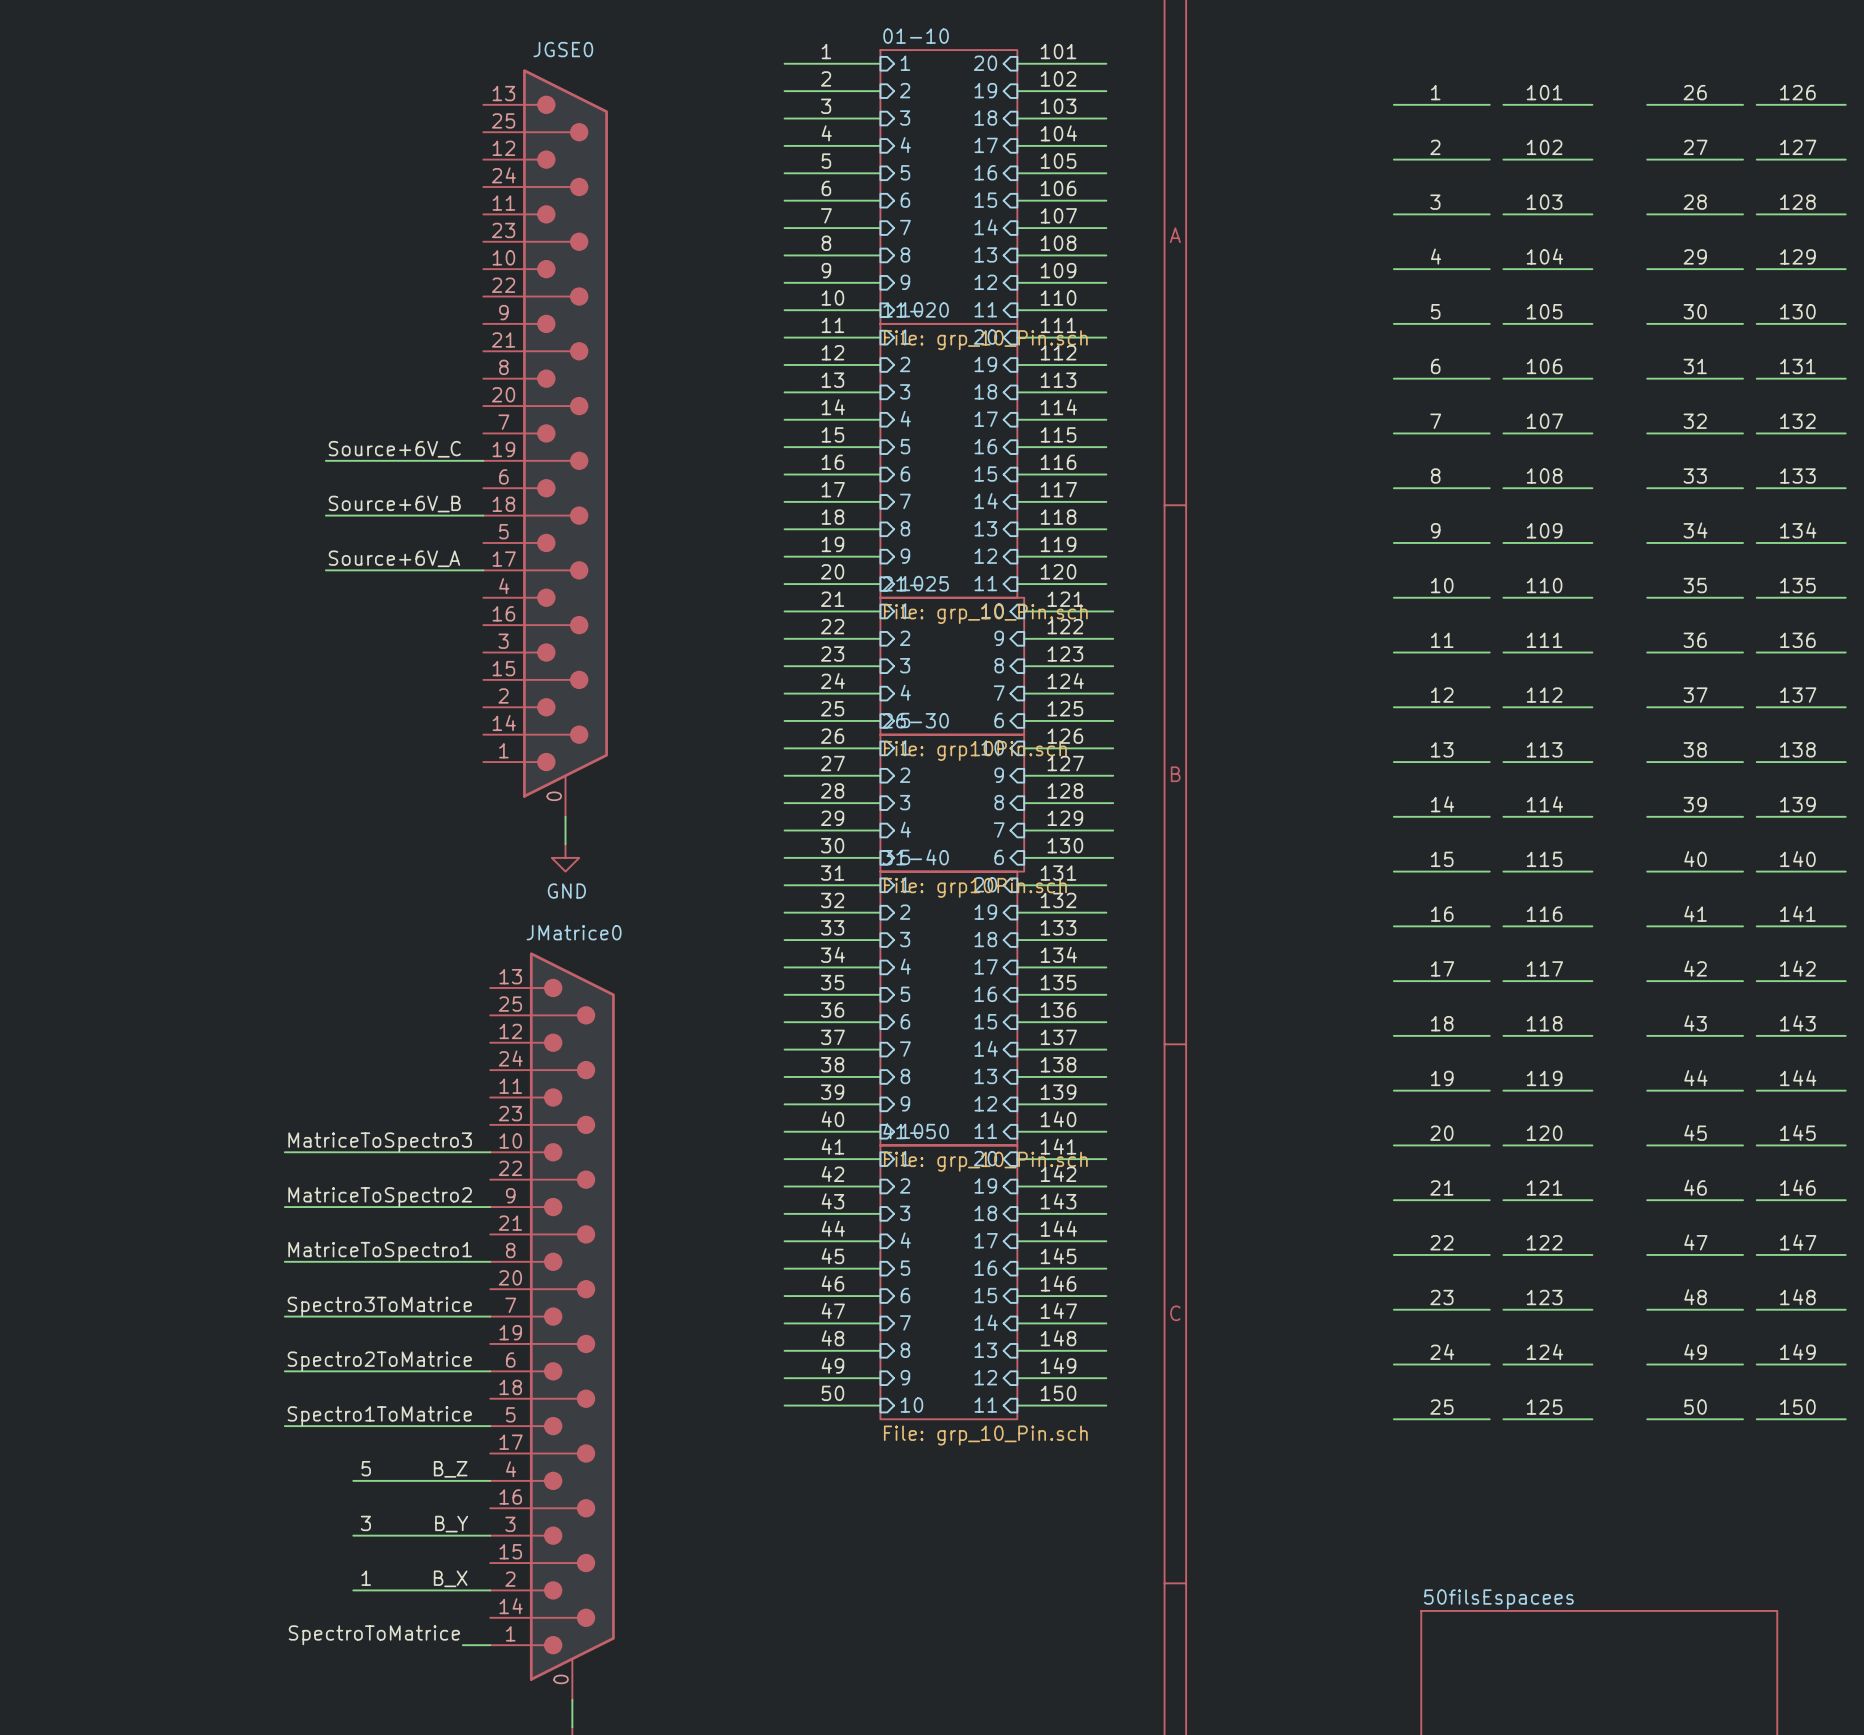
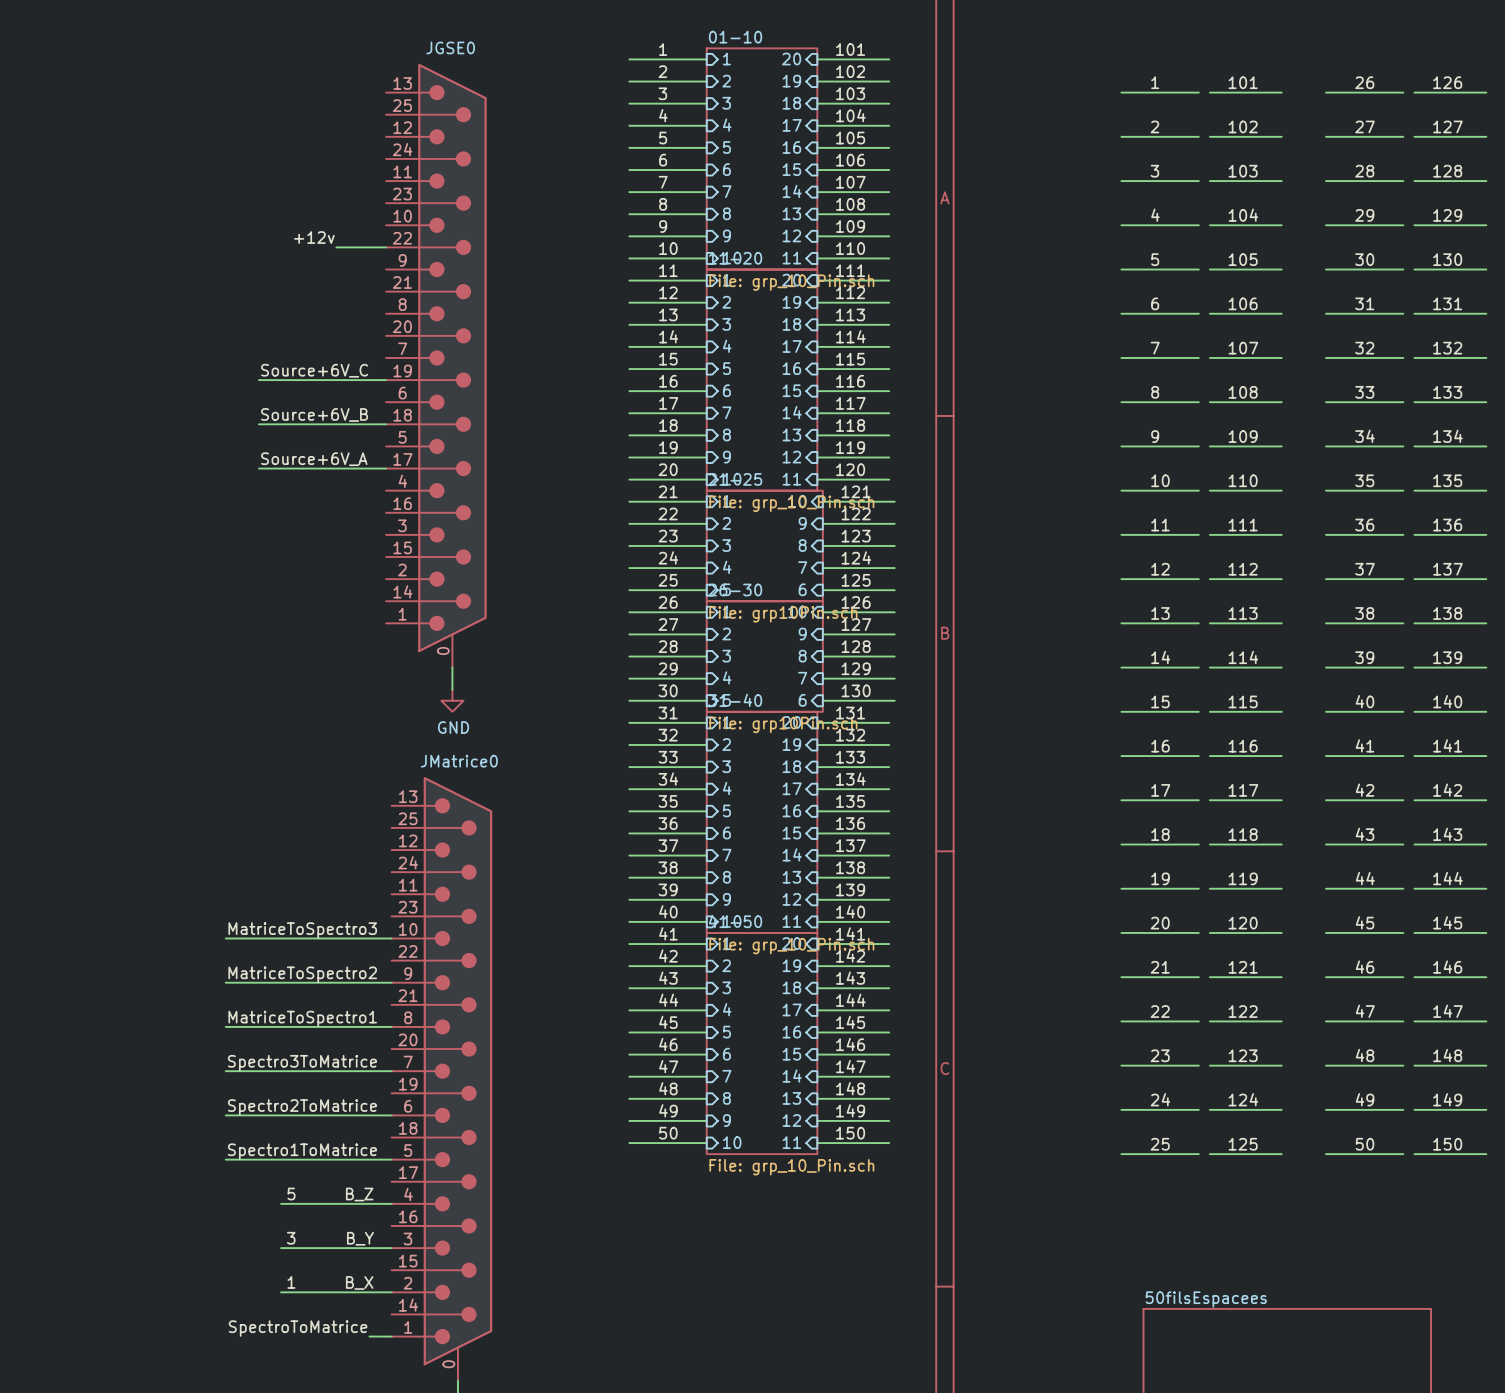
label: none -> +12v (314, 237)
wire: none -> (336, 247) (386, 247)

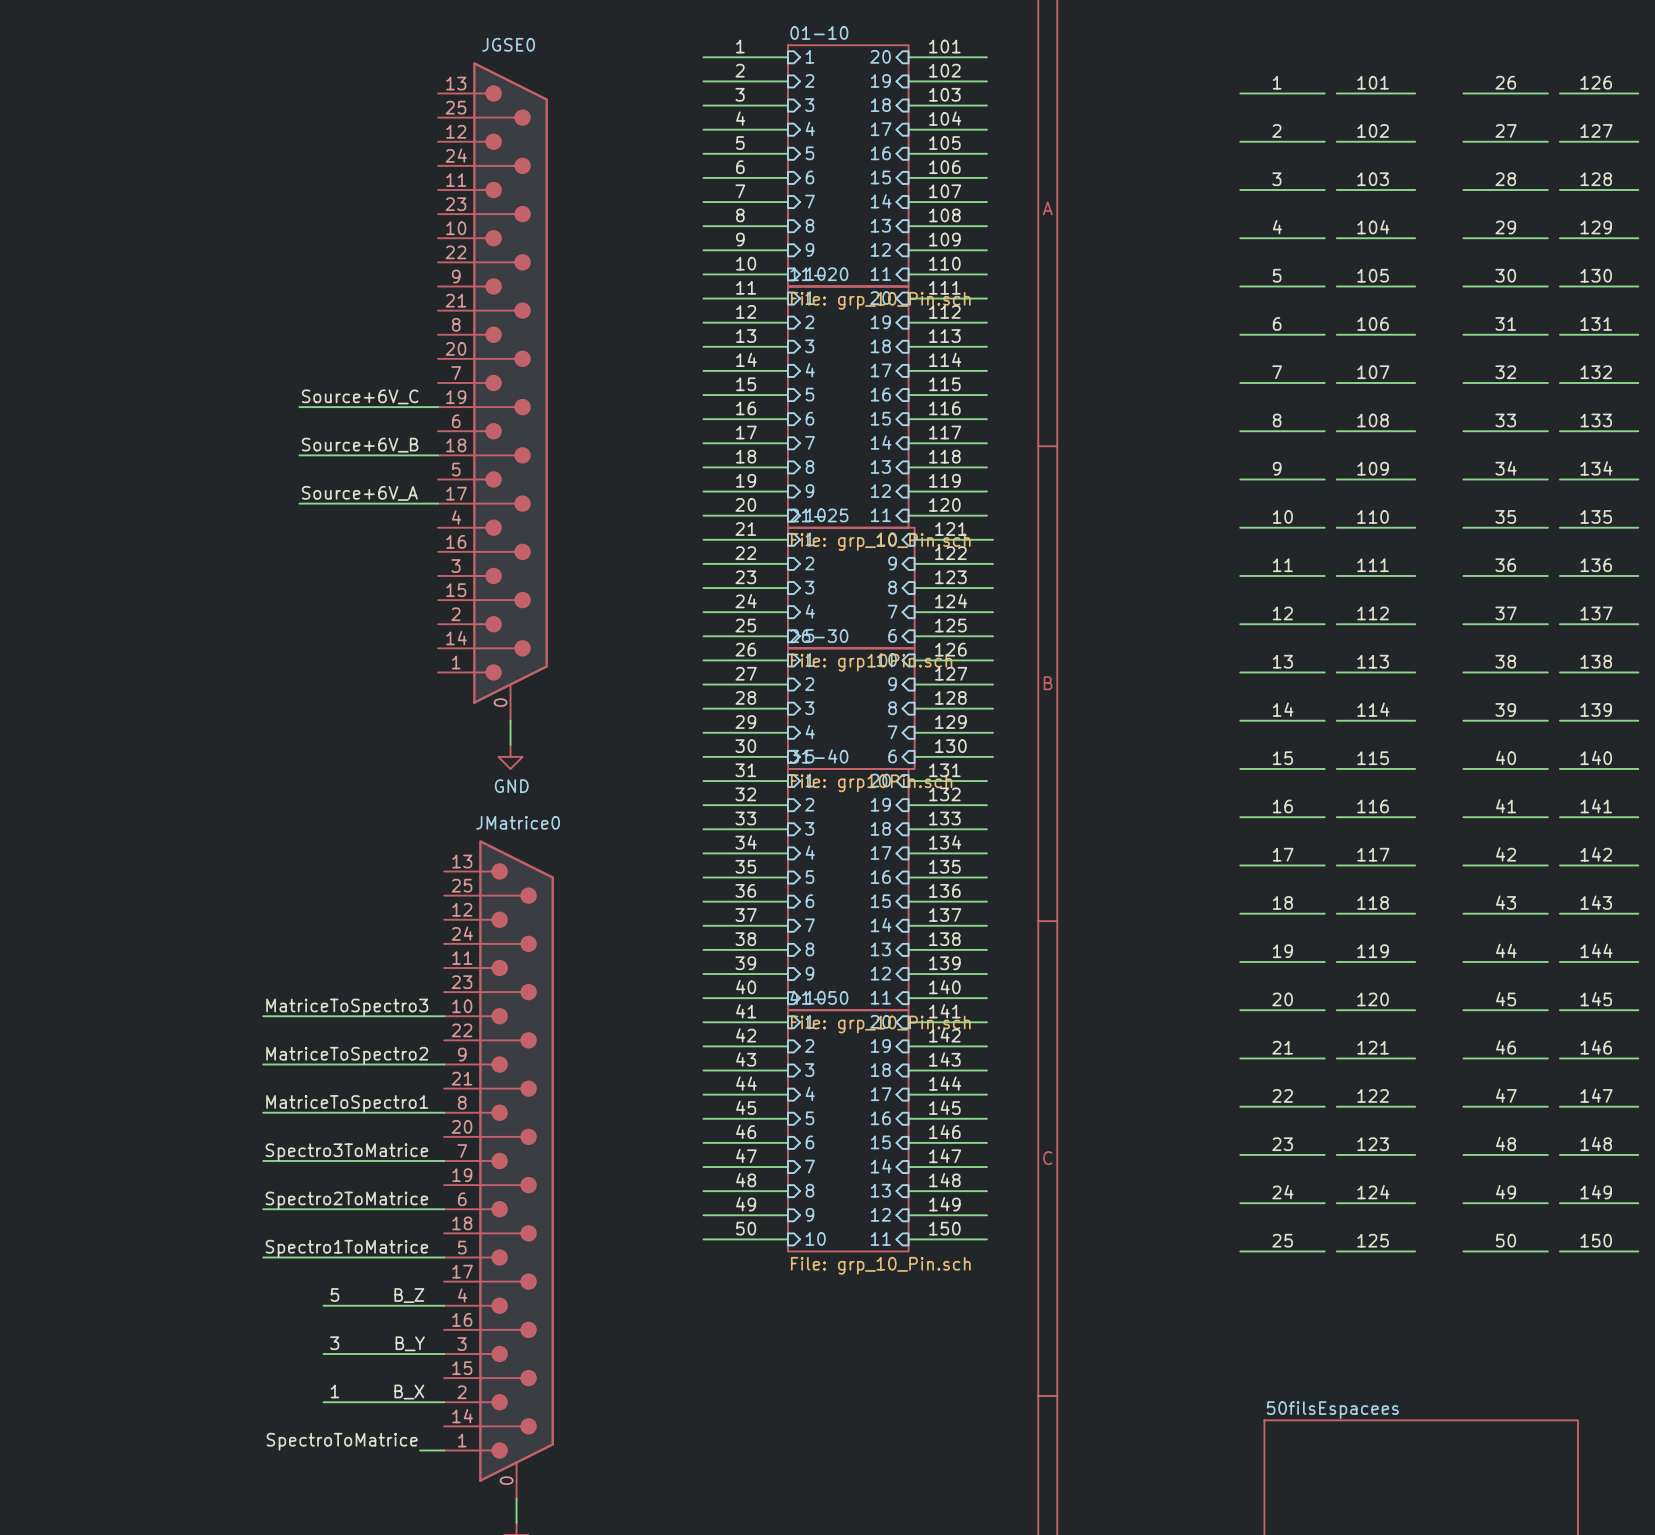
label: +12v (314, 237) -> none
wire: (336, 247) (386, 247) -> none

